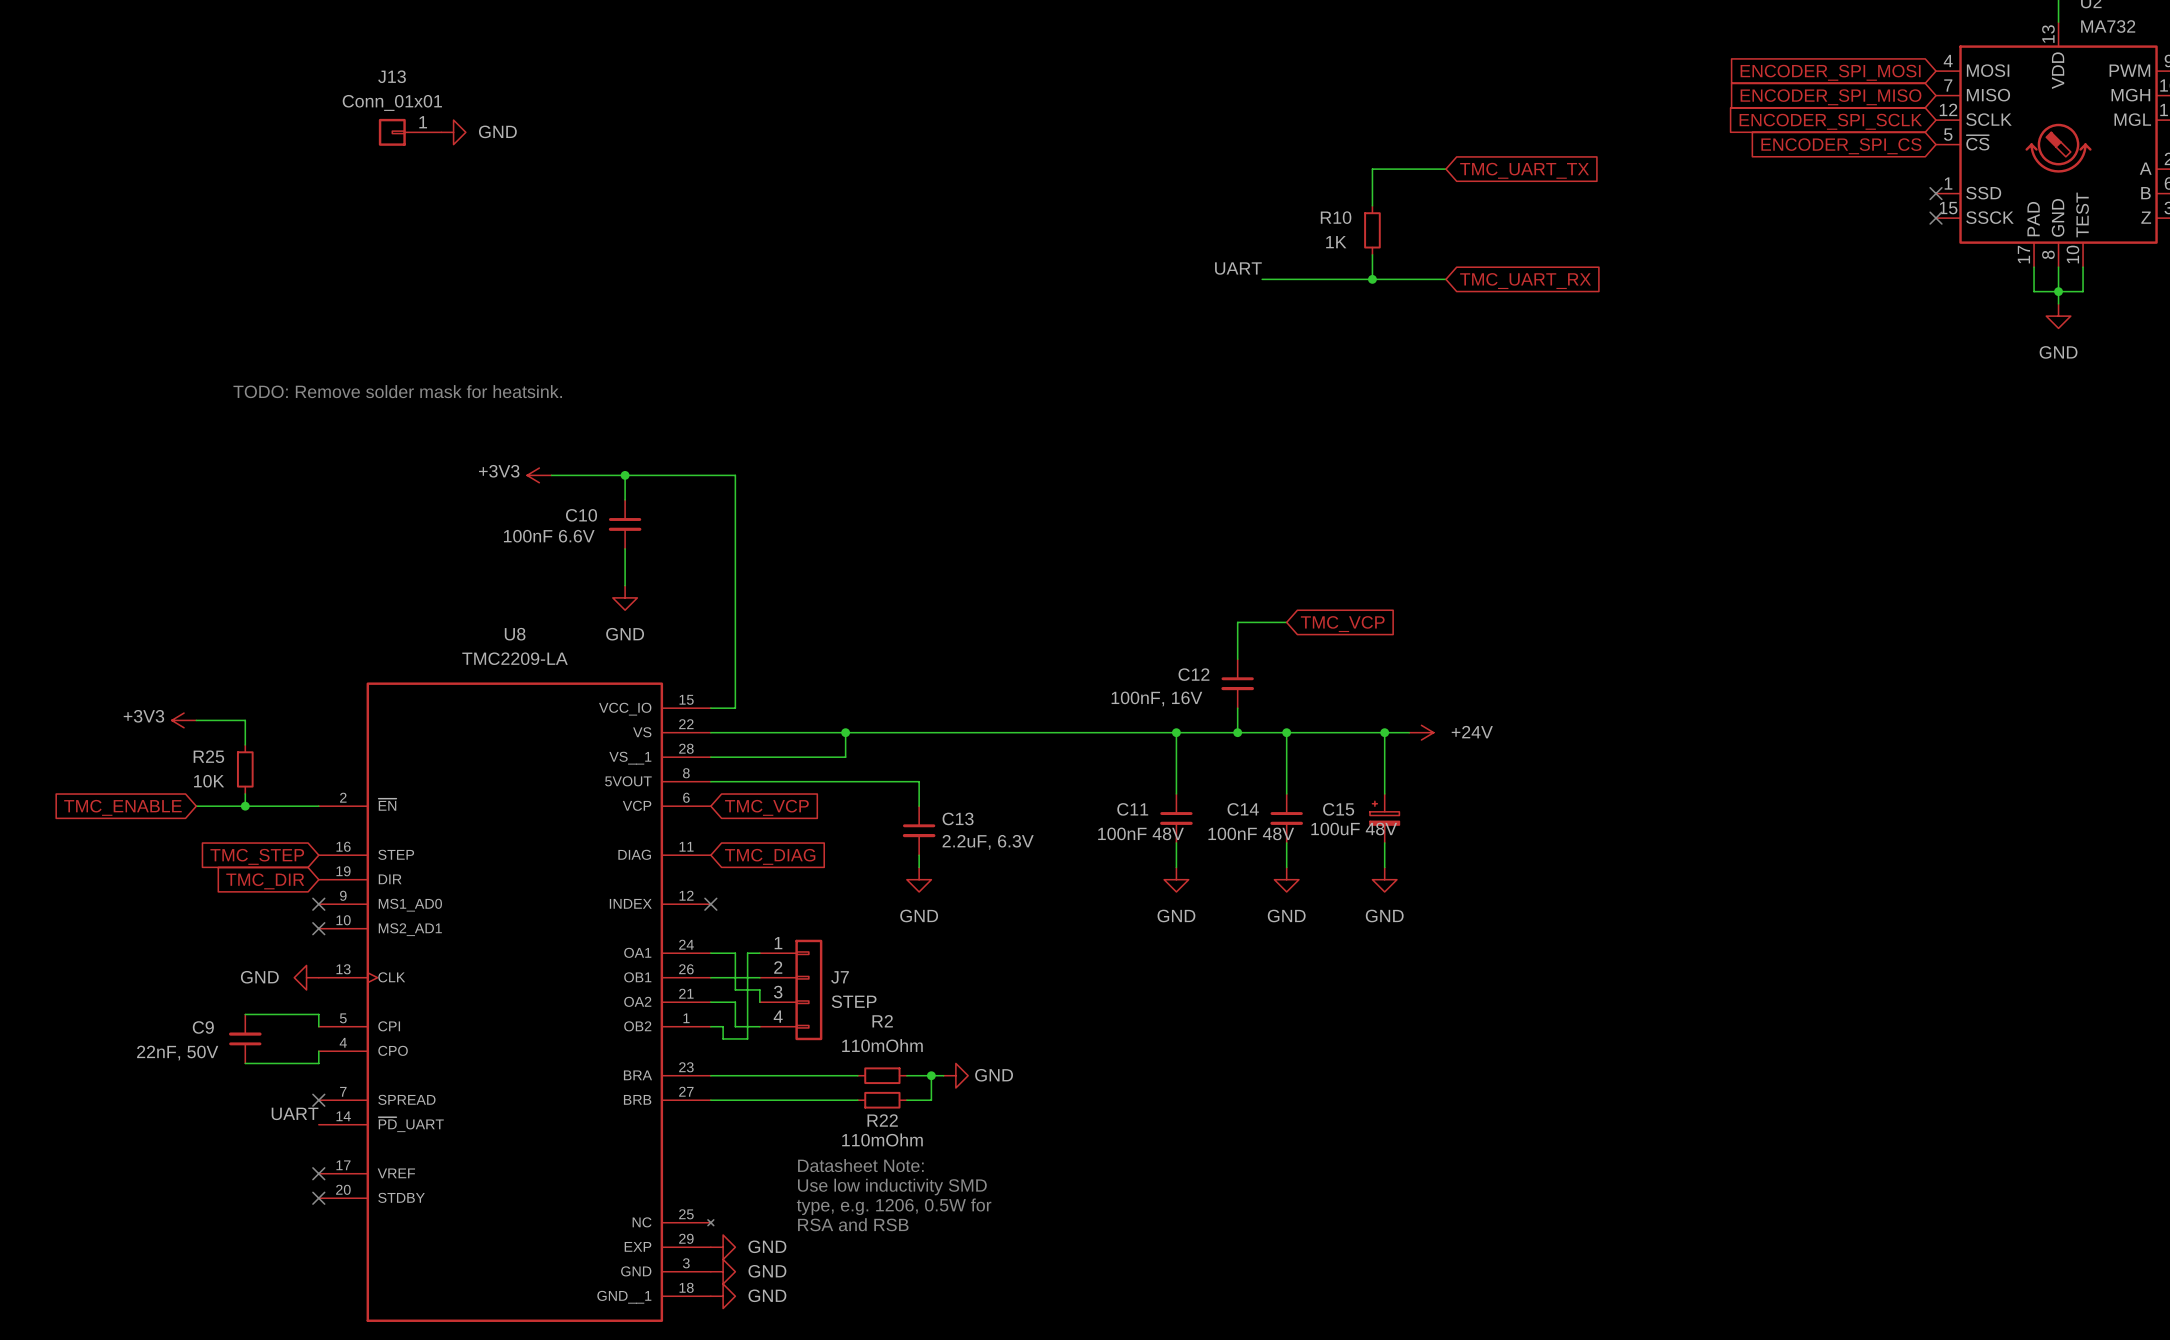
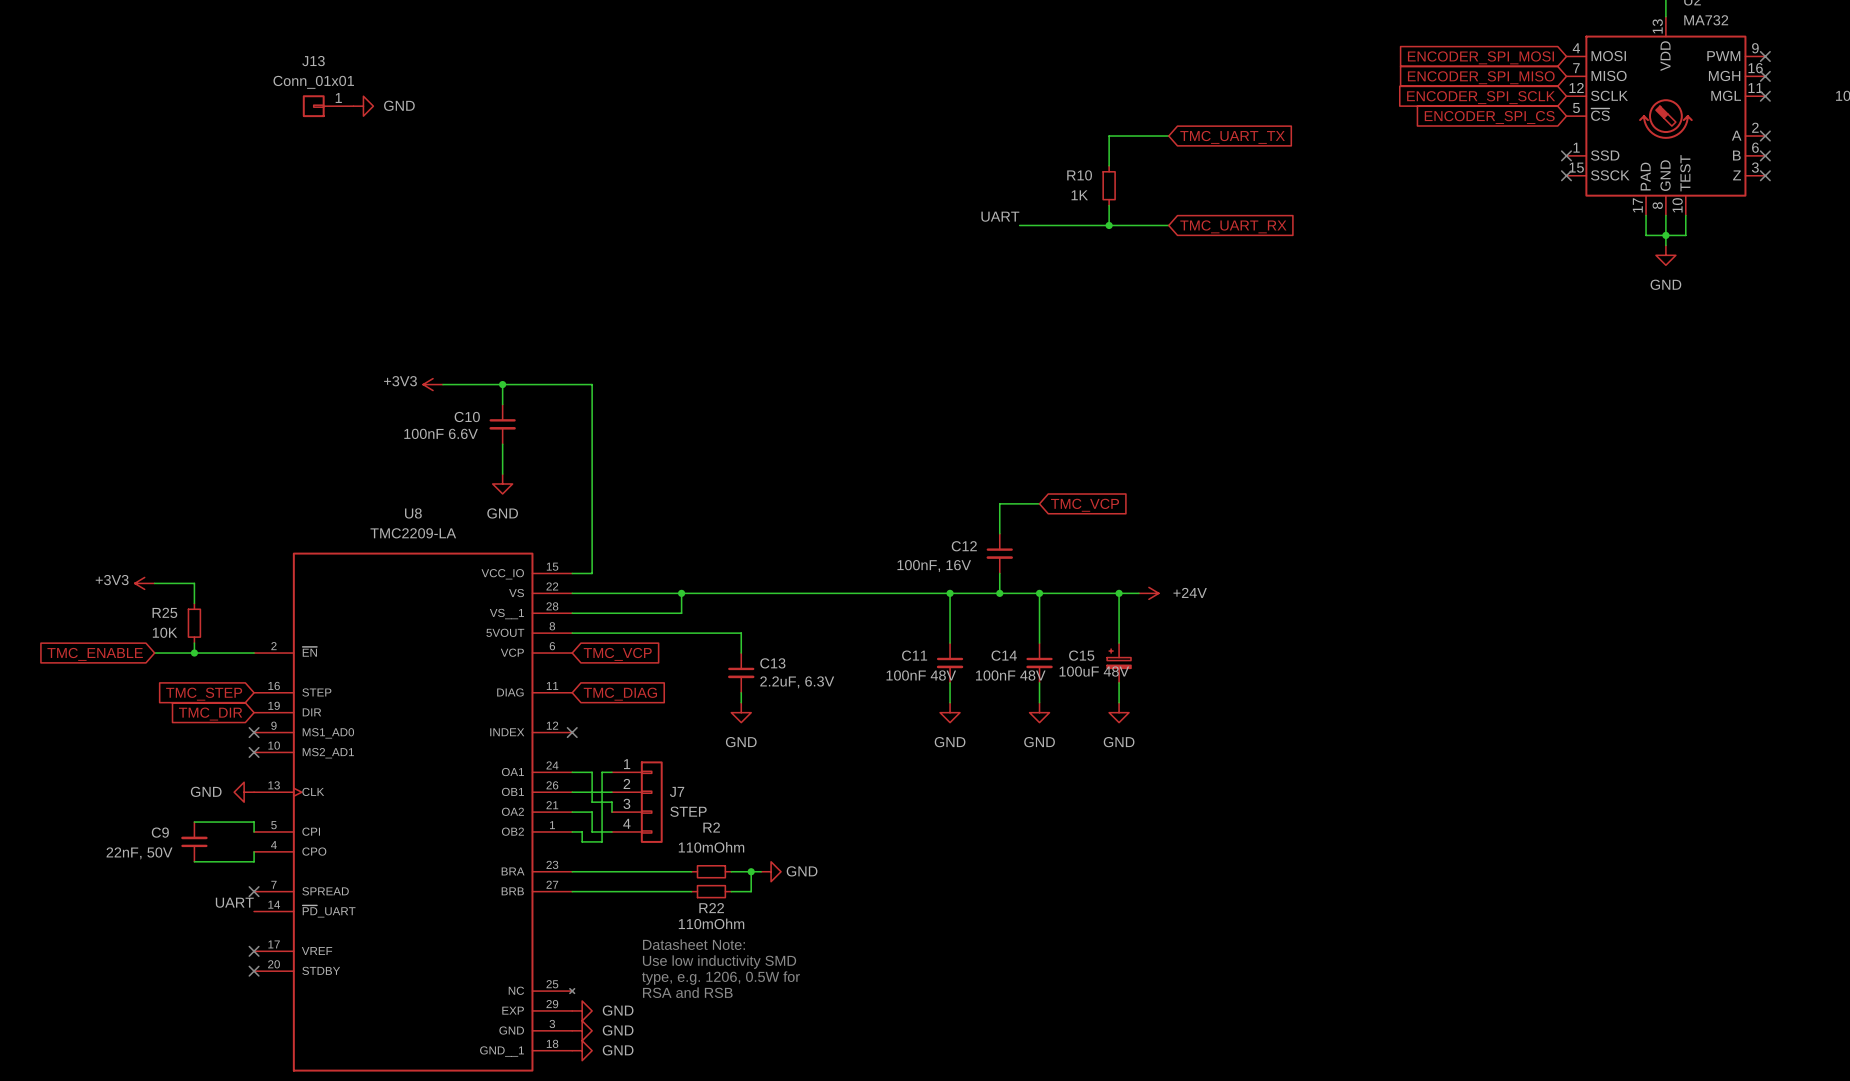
text: TODO: Remove solder mask for heatsink. (397, 391) -> none

